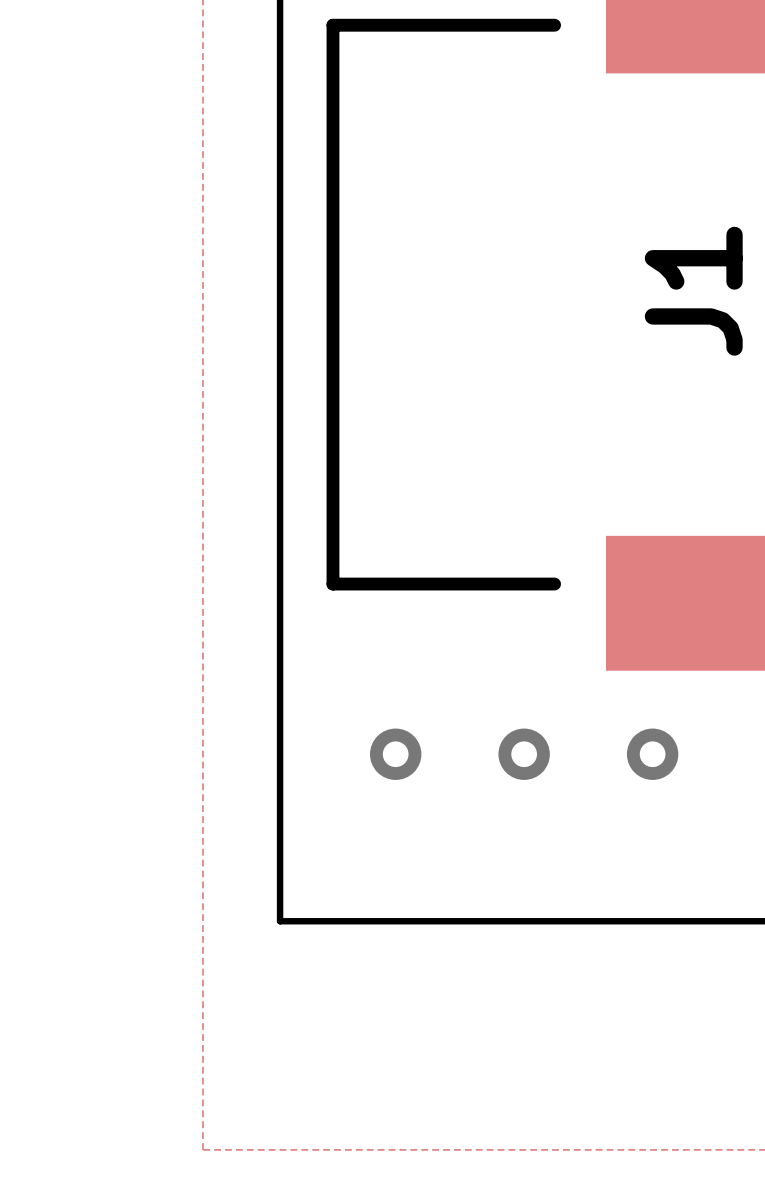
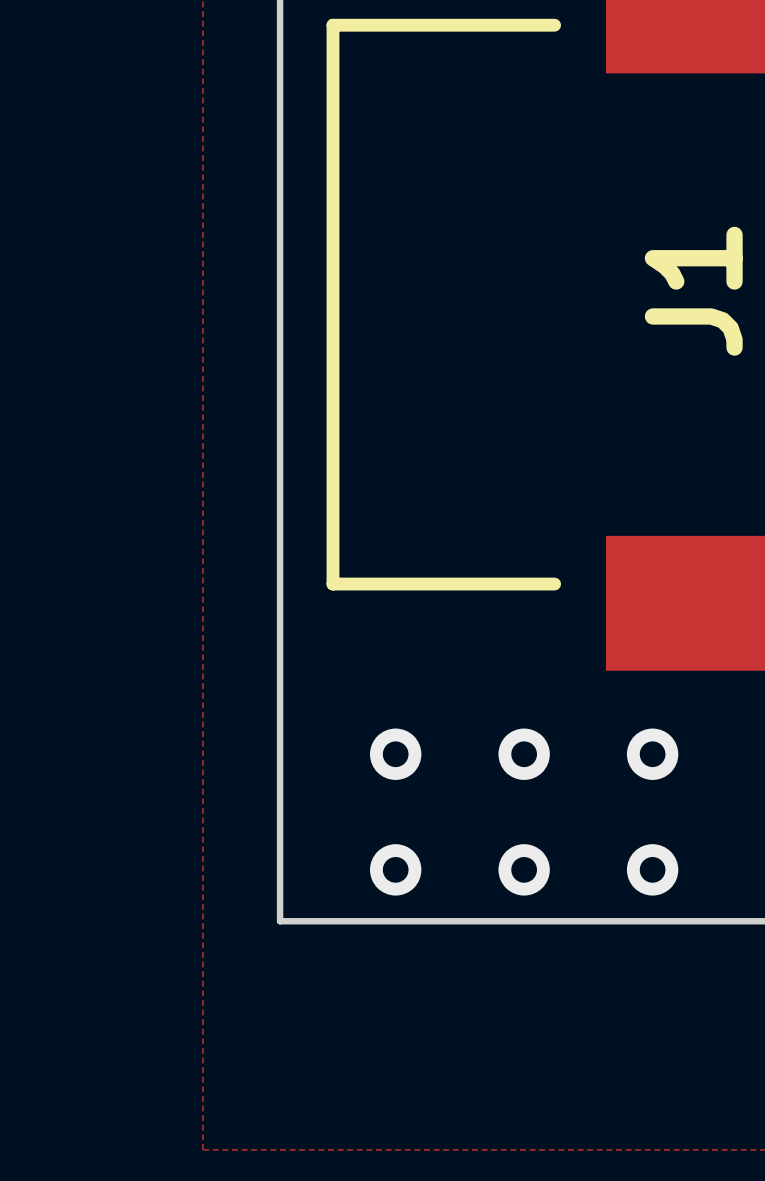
via: none -> (395, 869)
via: none -> (524, 869)
via: none -> (652, 869)

